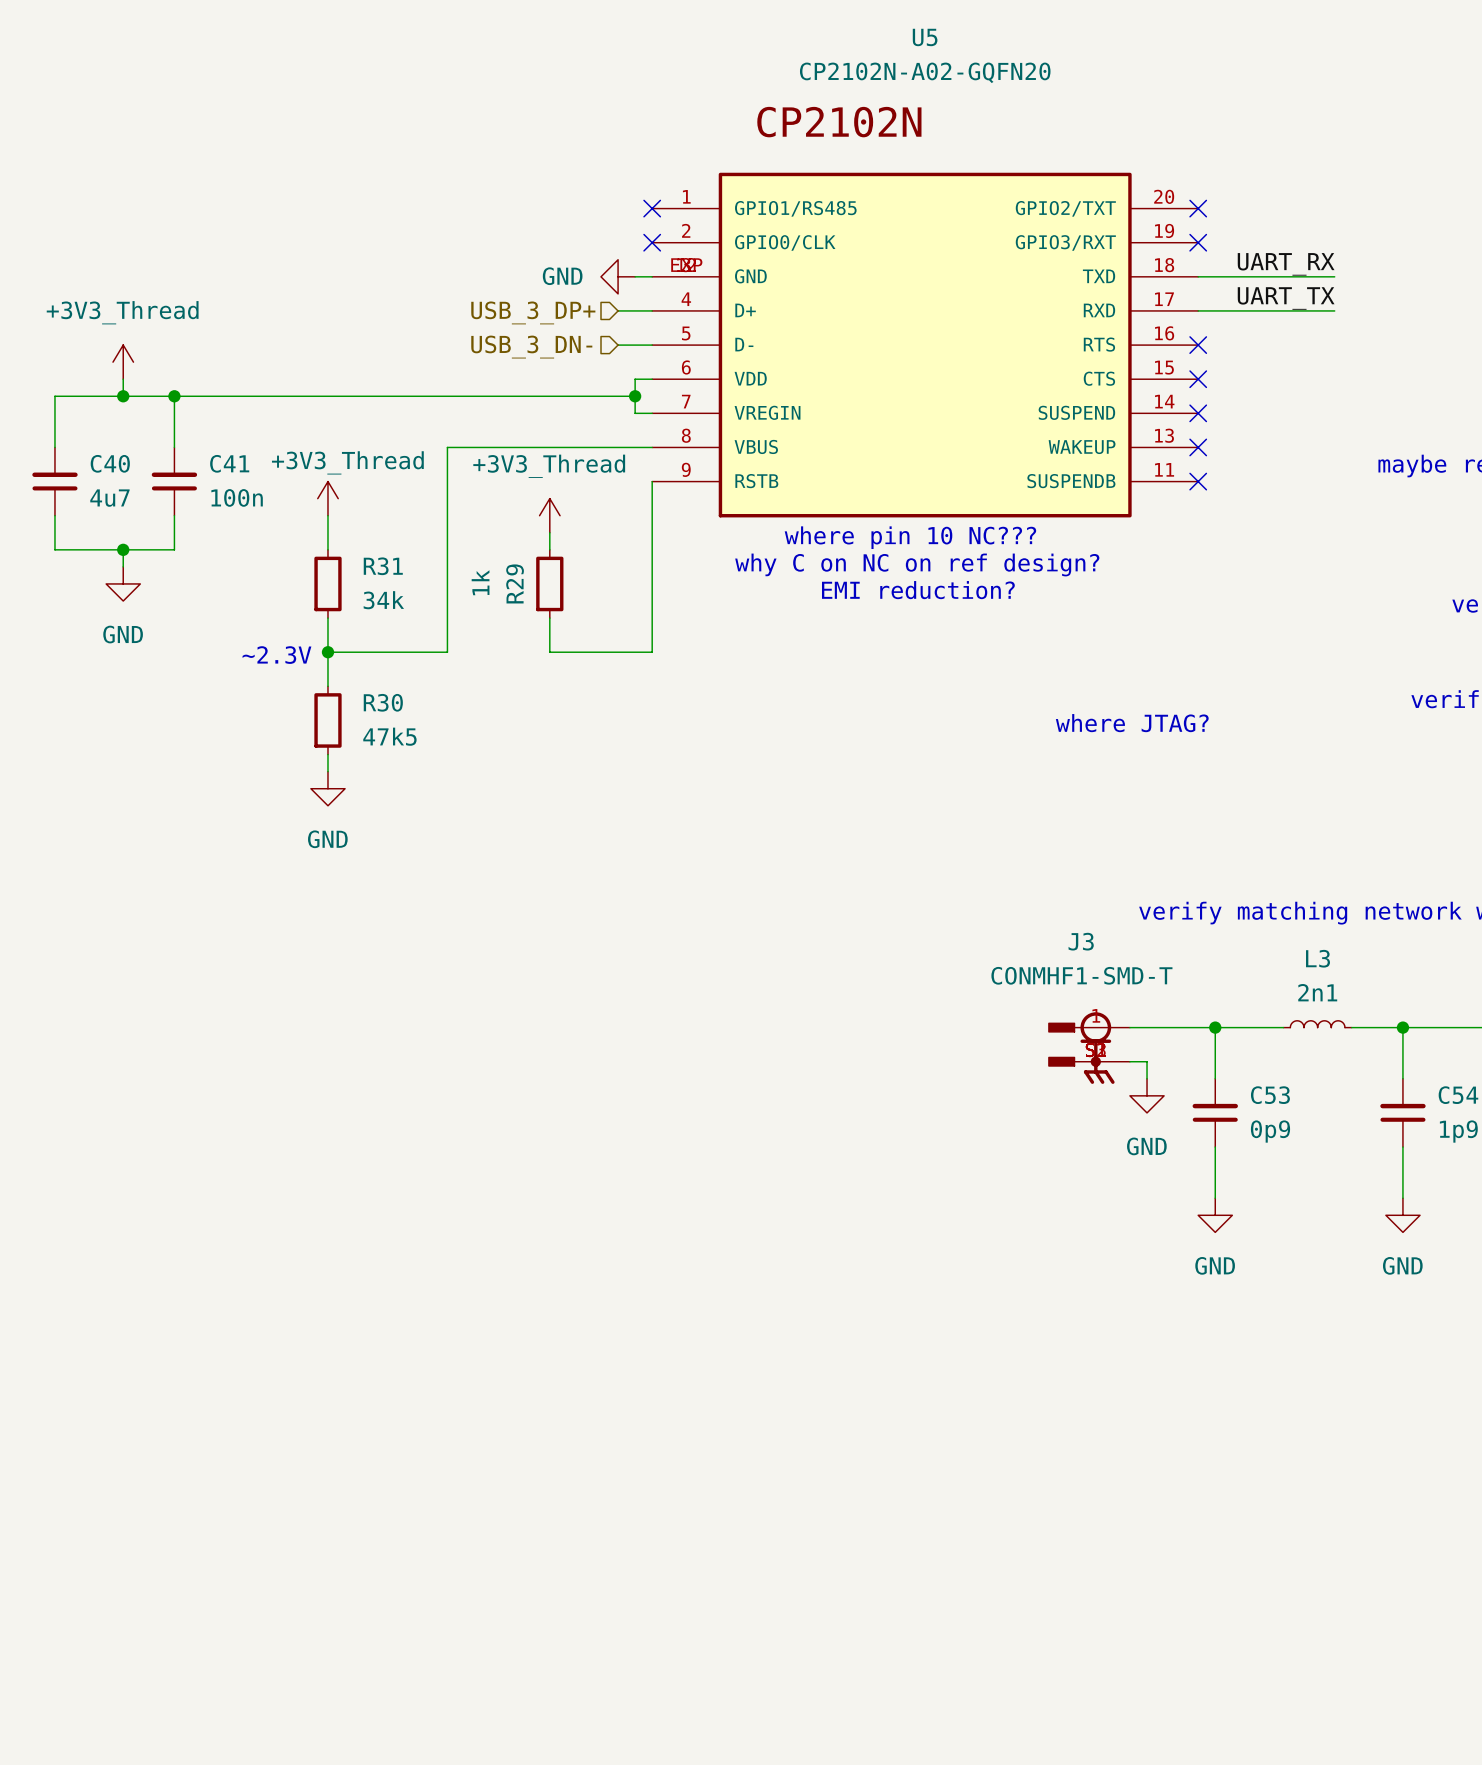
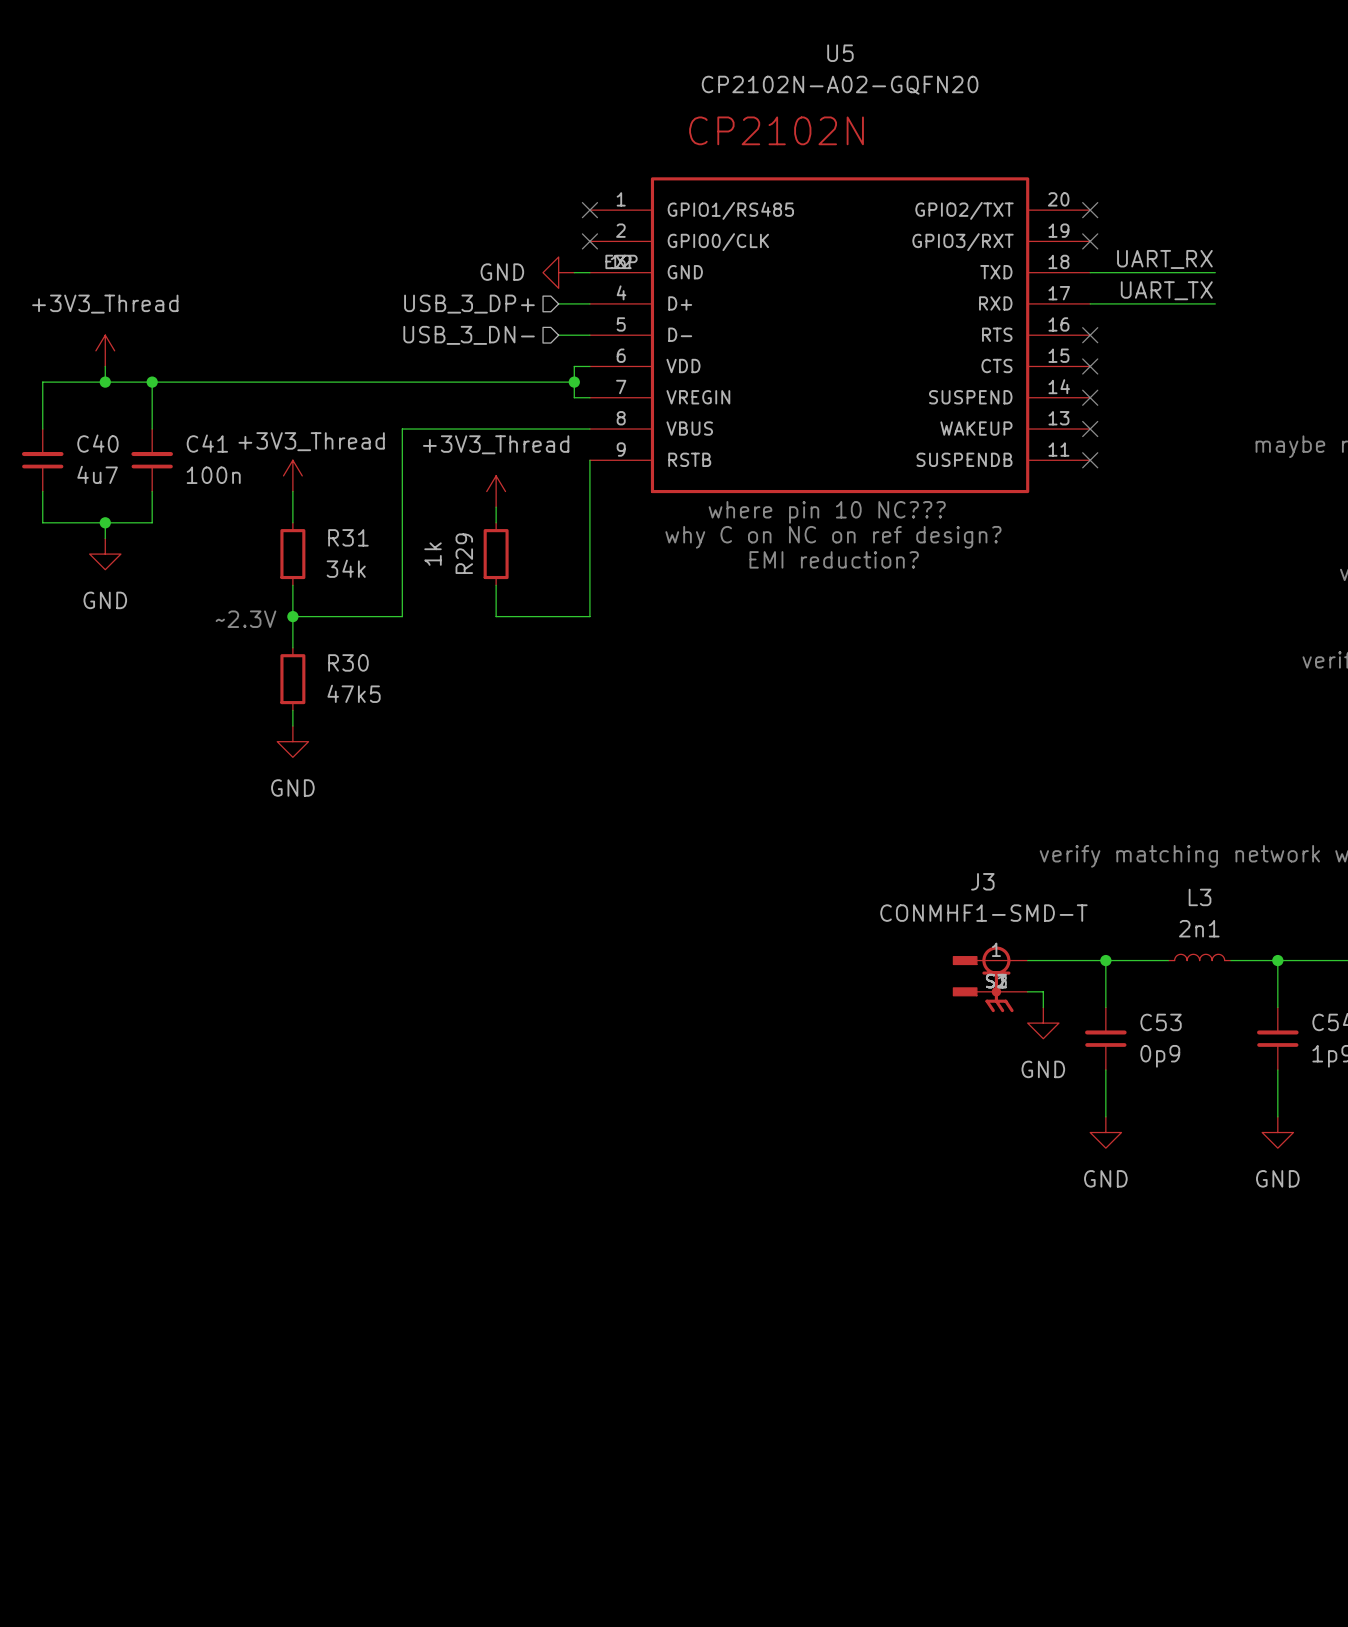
text: where JTAG? (1132, 723) -> none

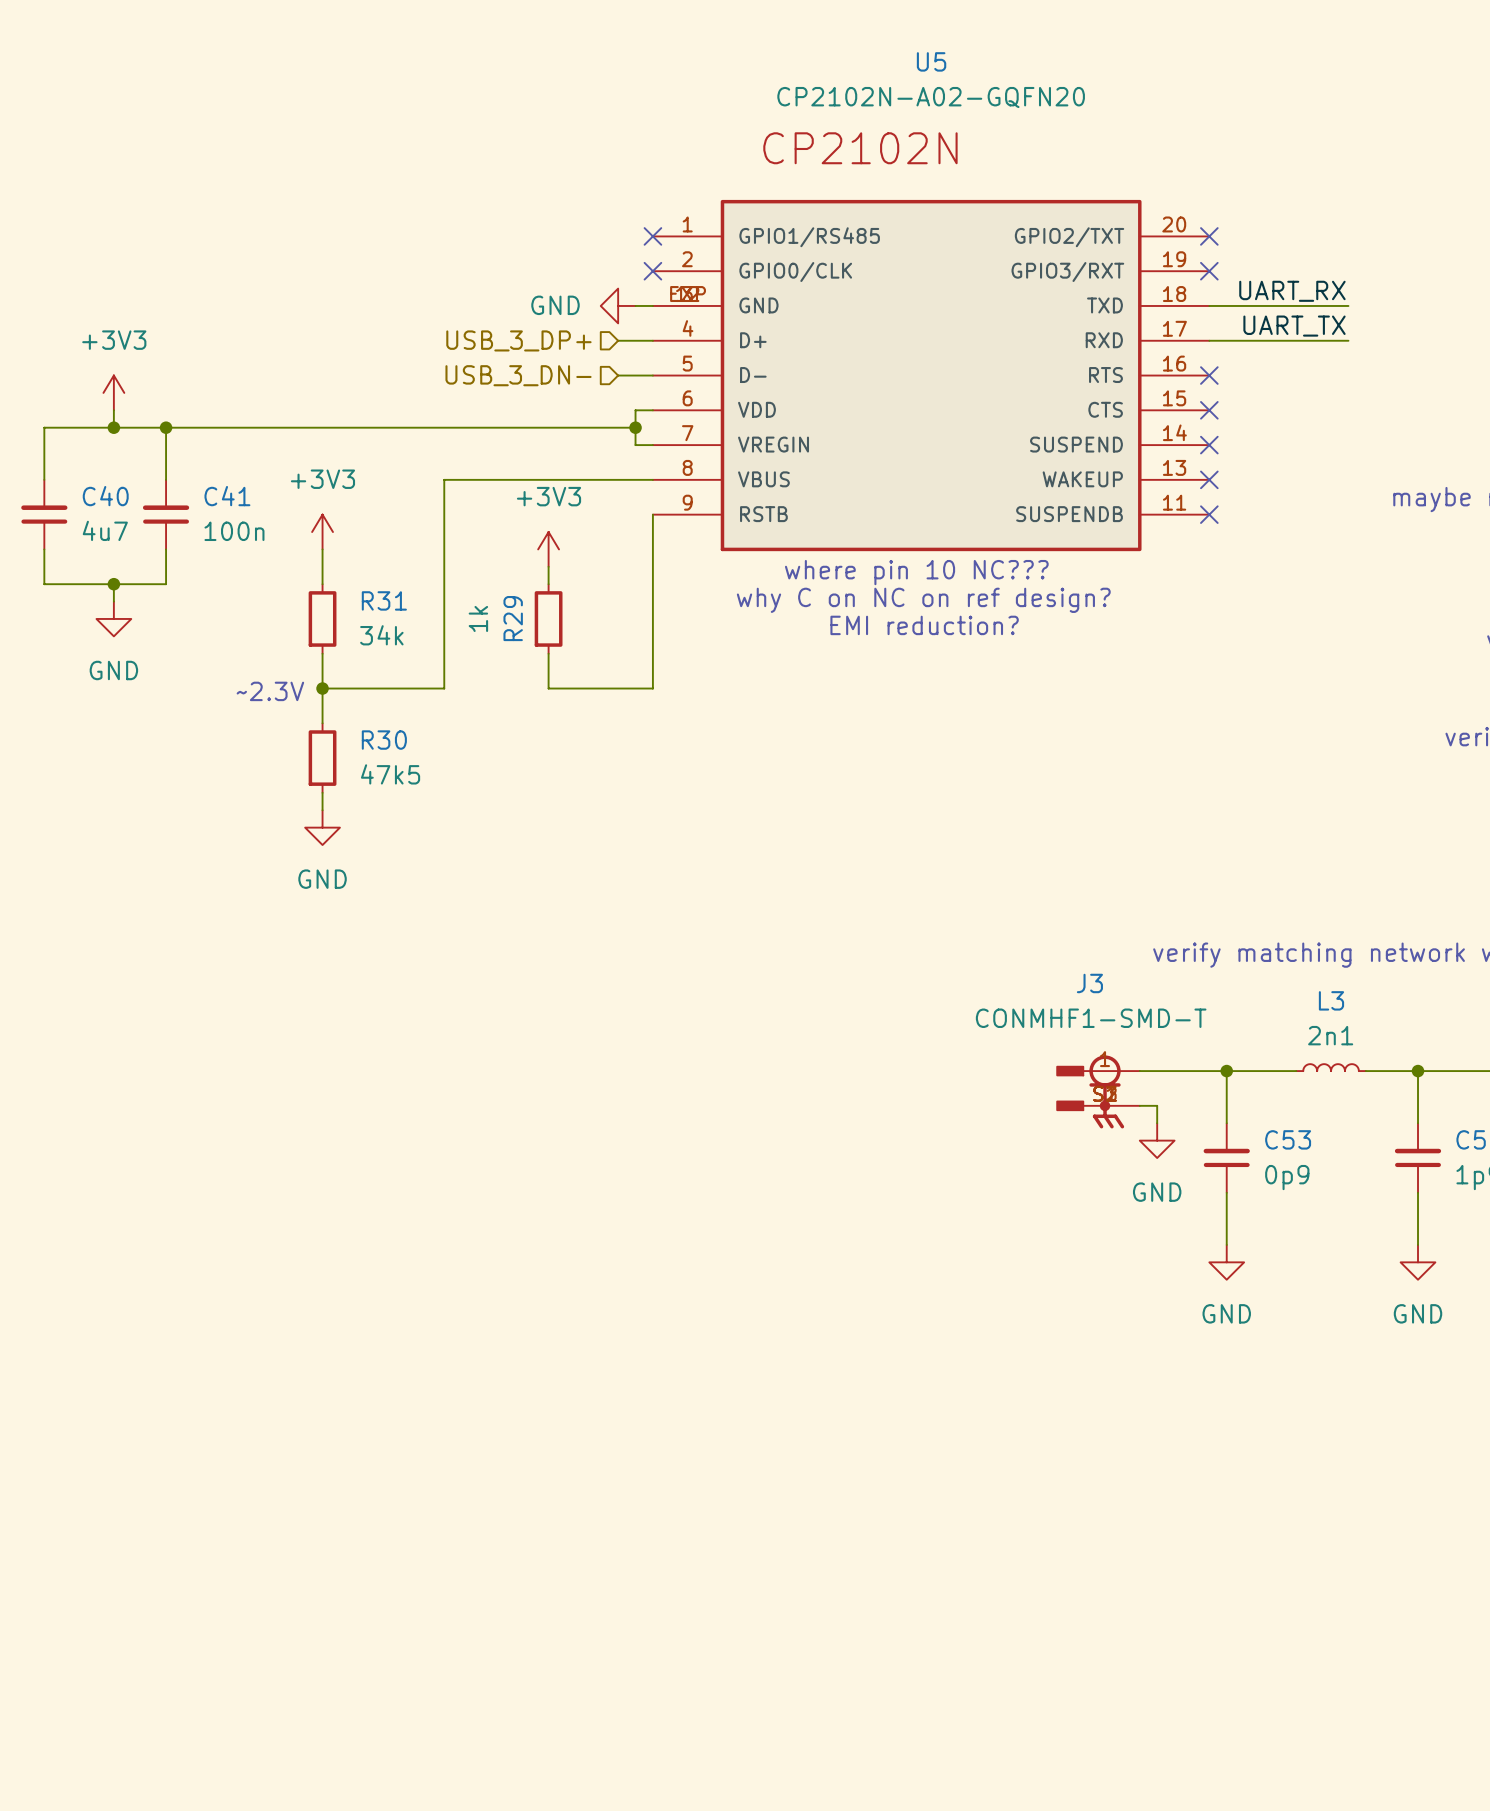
power symbol: +3V3_Thread (105, 350) -> +3V3 (113, 392)
power symbol: +3V3_Thread (292, 475) -> +3V3 (322, 532)
power symbol: +3V3_Thread (496, 491) -> +3V3 (548, 549)

